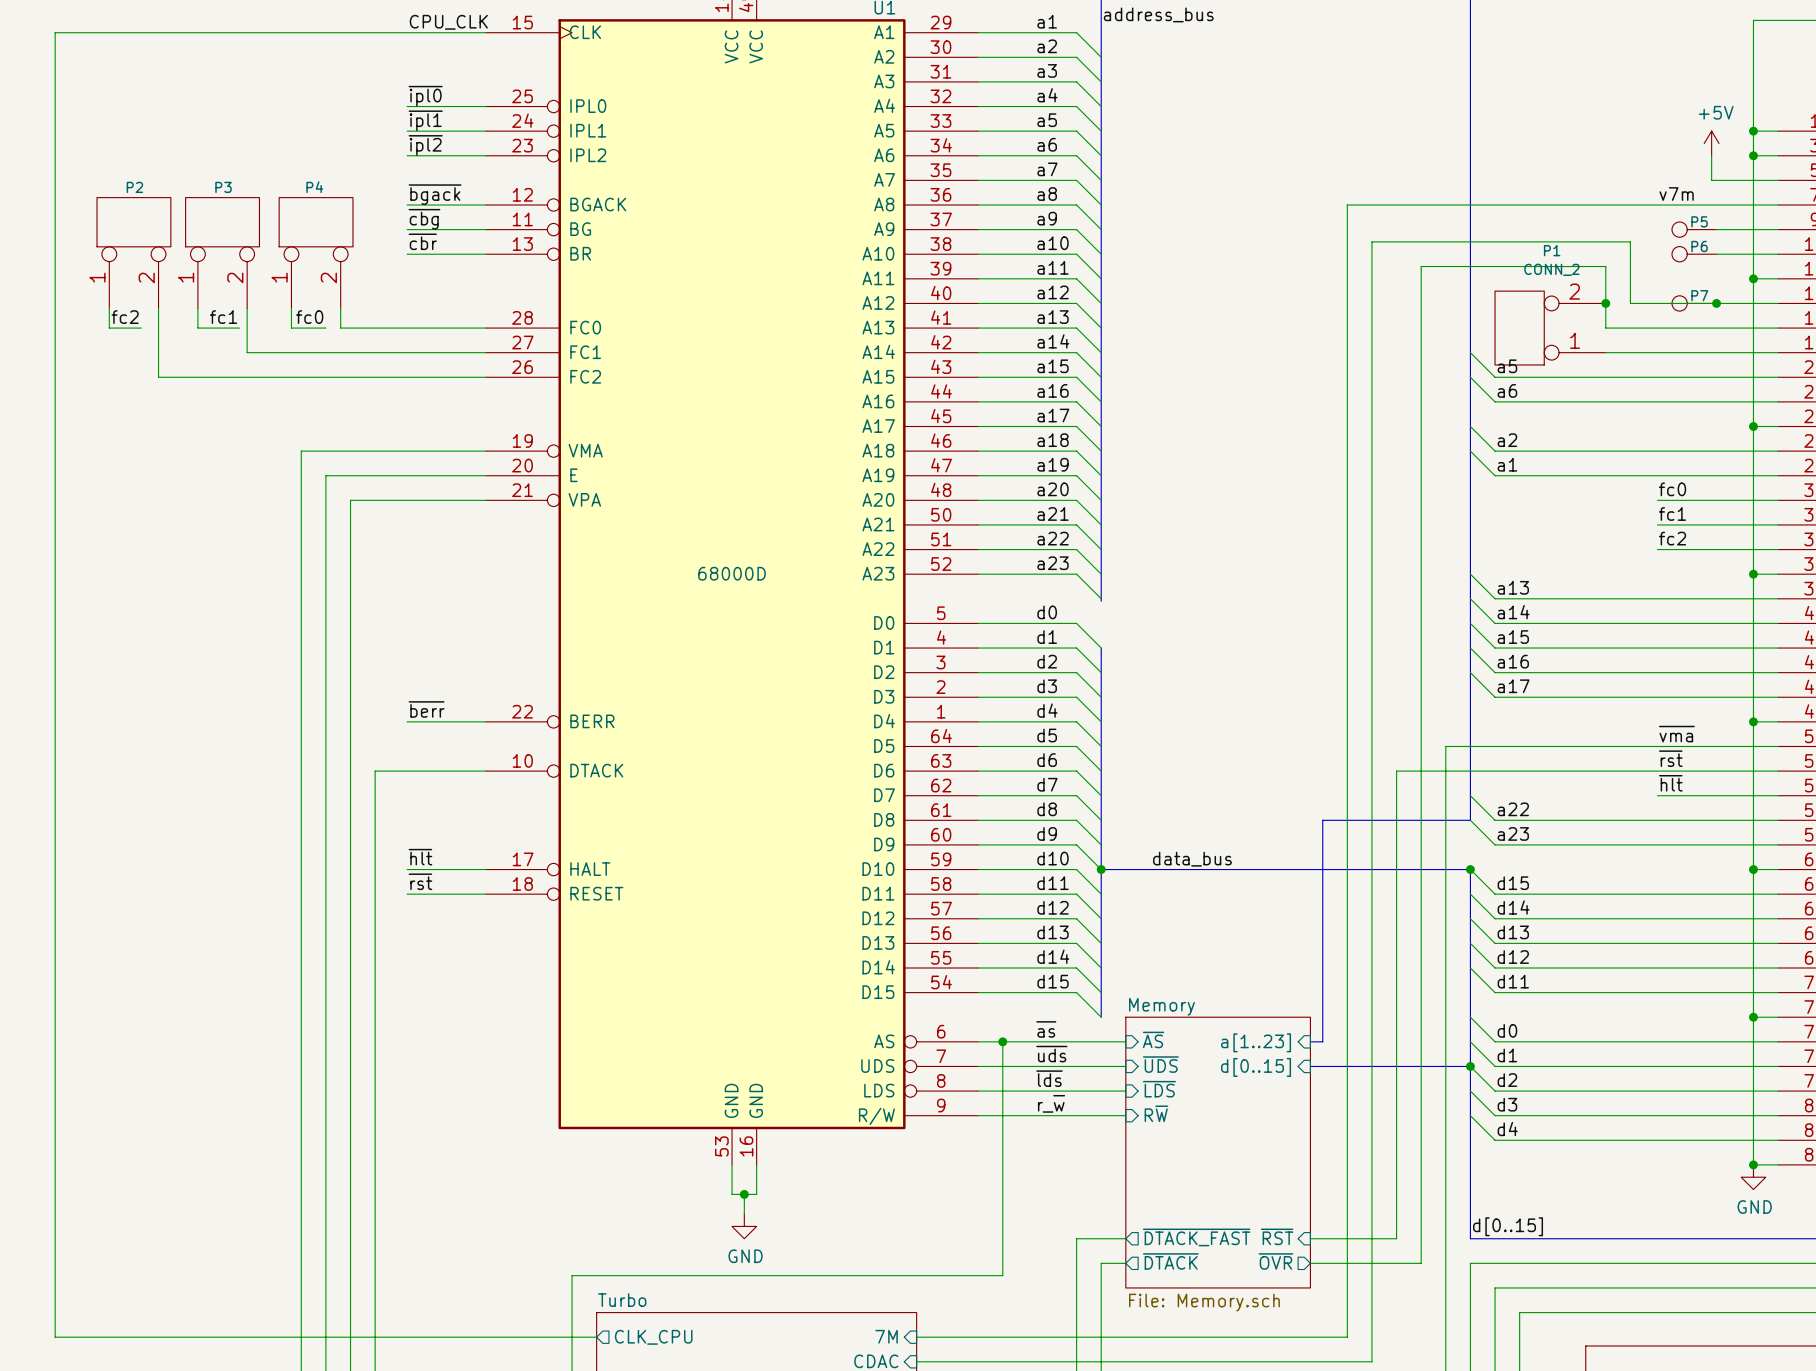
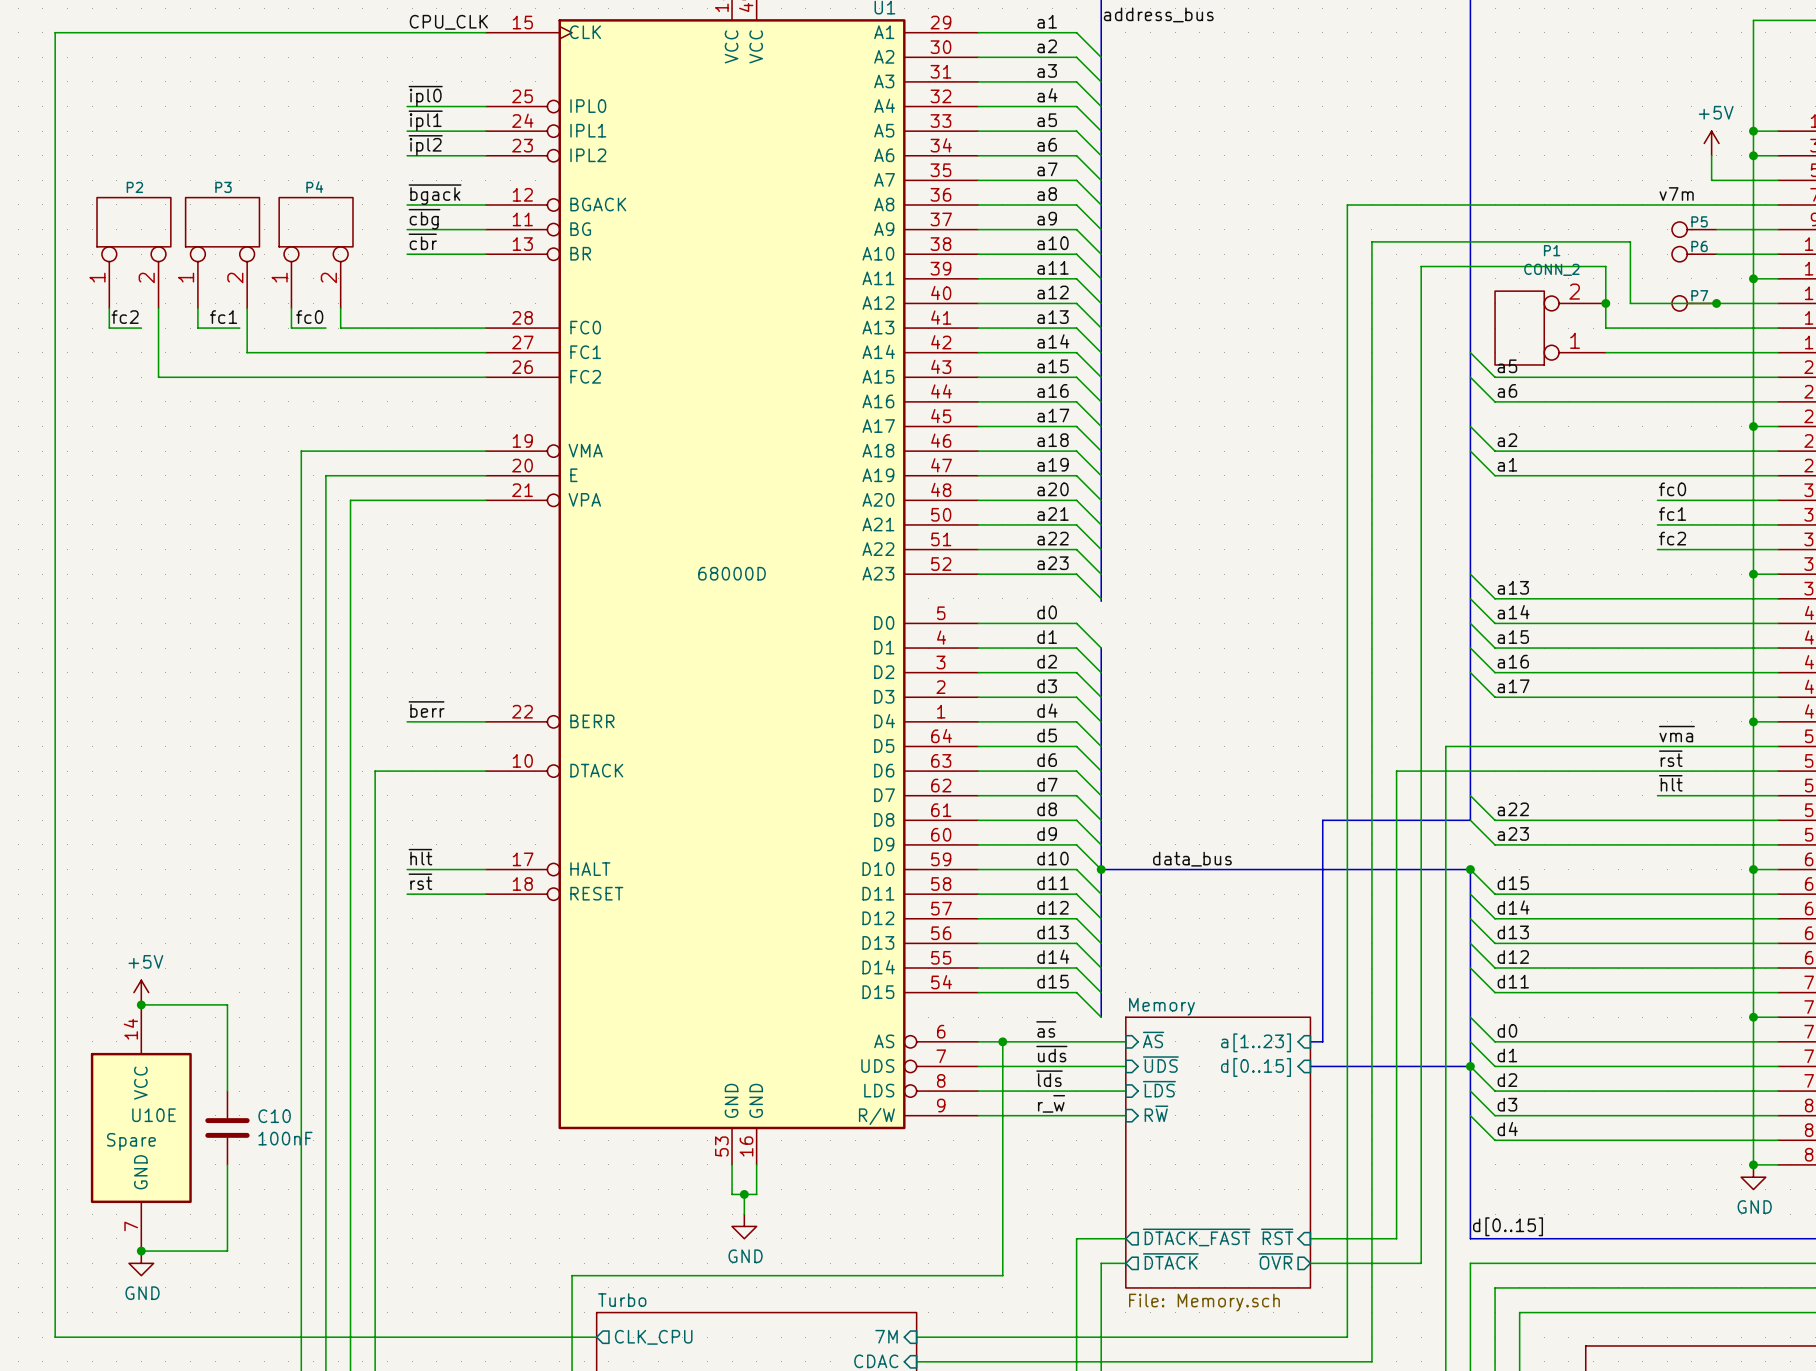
power symbol: none -> +5V (141, 992)
wire: none -> (141, 1004) (227, 1004) (227, 1091)
junction: none -> (141, 1004)
U10E: none -> Spare (141, 1127)
C10: none -> 100nF (227, 1127)
wire: none -> (227, 1164) (227, 1251) (141, 1251)
junction: none -> (141, 1251)
power symbol: none -> GND (141, 1263)

